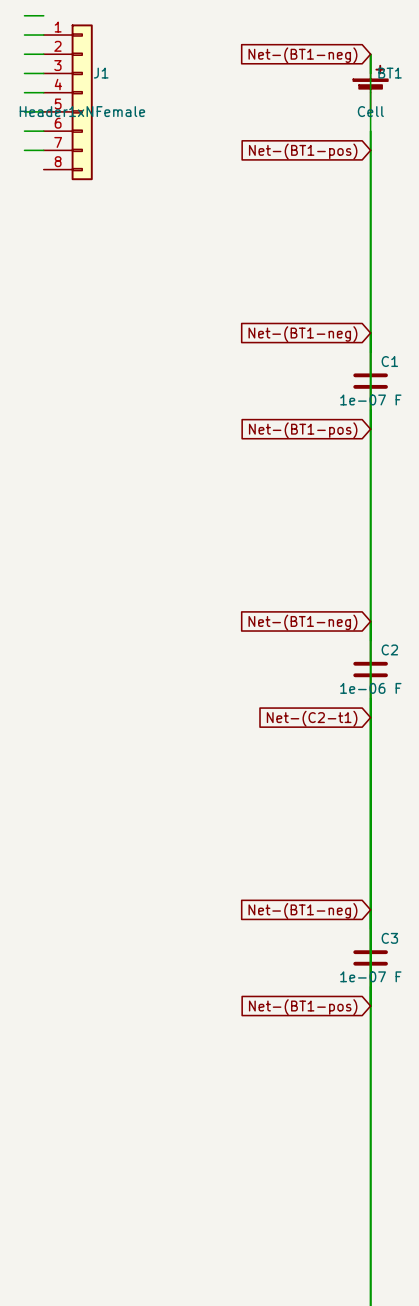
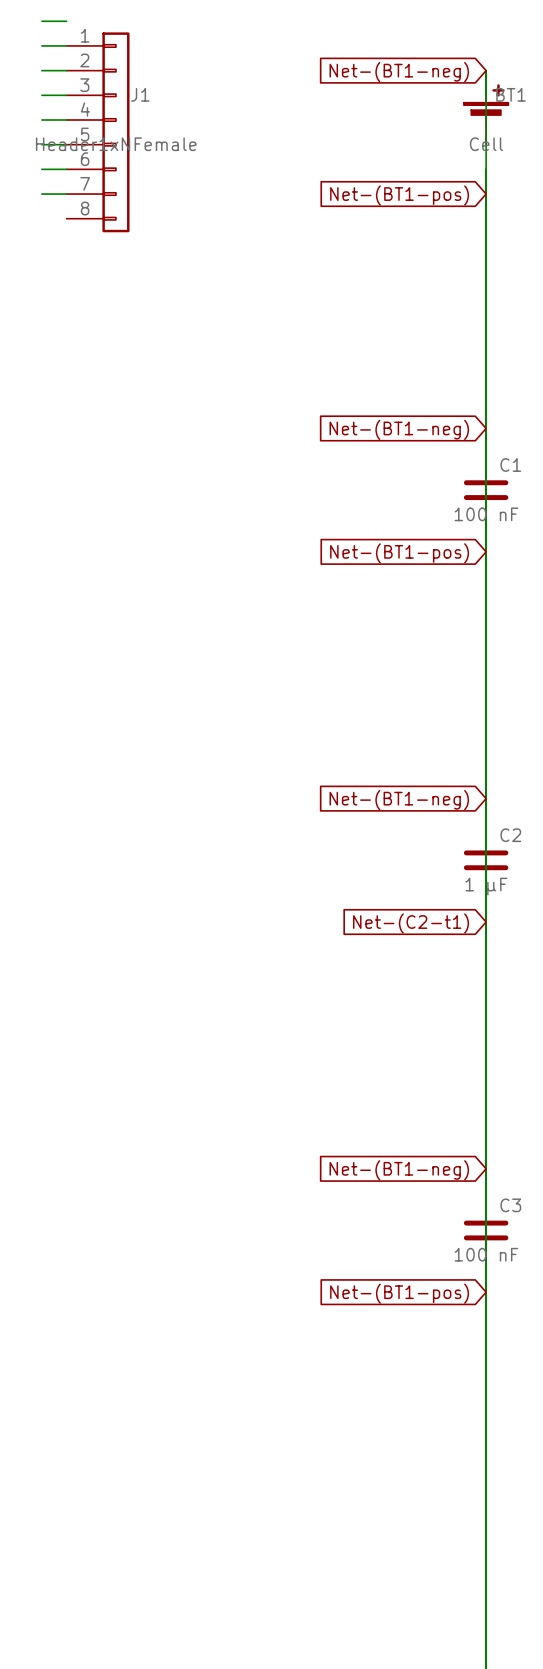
C1 value: 1e-07 F (370, 399) -> 100 nF (486, 514)
C2 value: 1e-06 F (370, 688) -> 1 µF (486, 886)
C3 value: 1e-07 F (370, 976) -> 100 nF (486, 1254)

